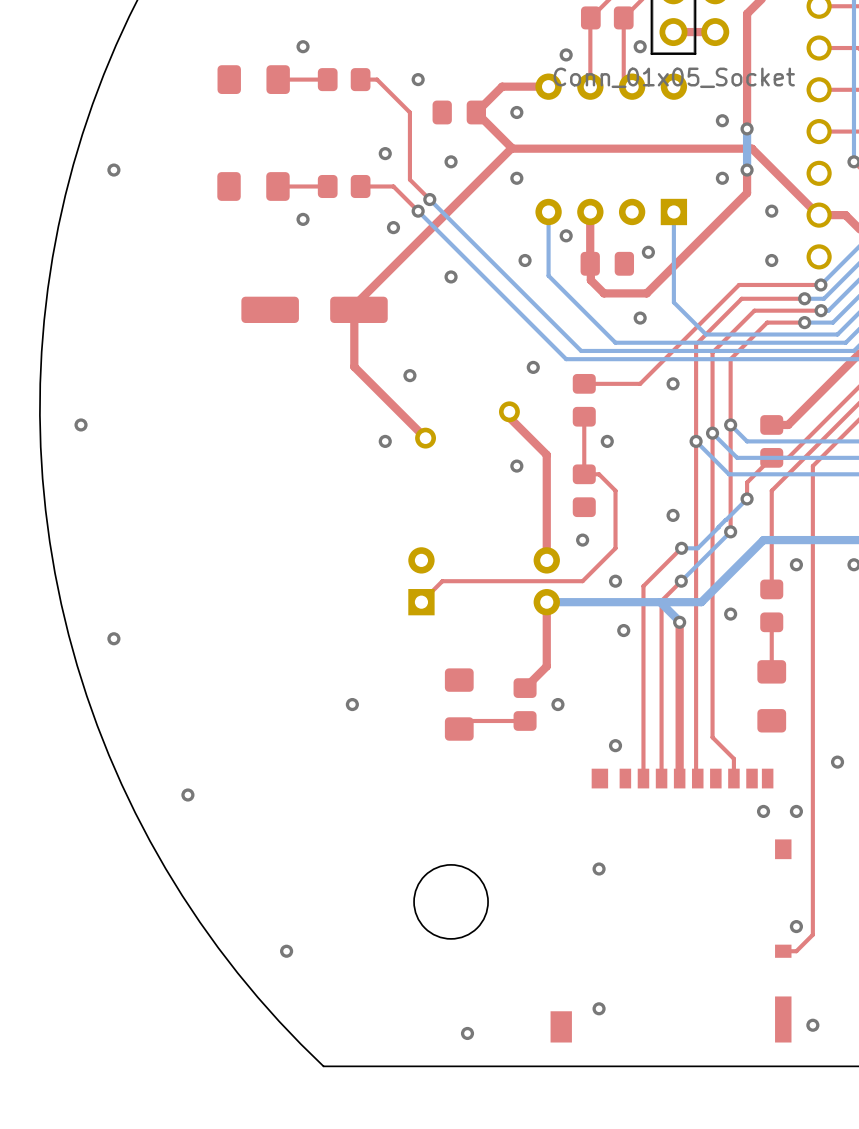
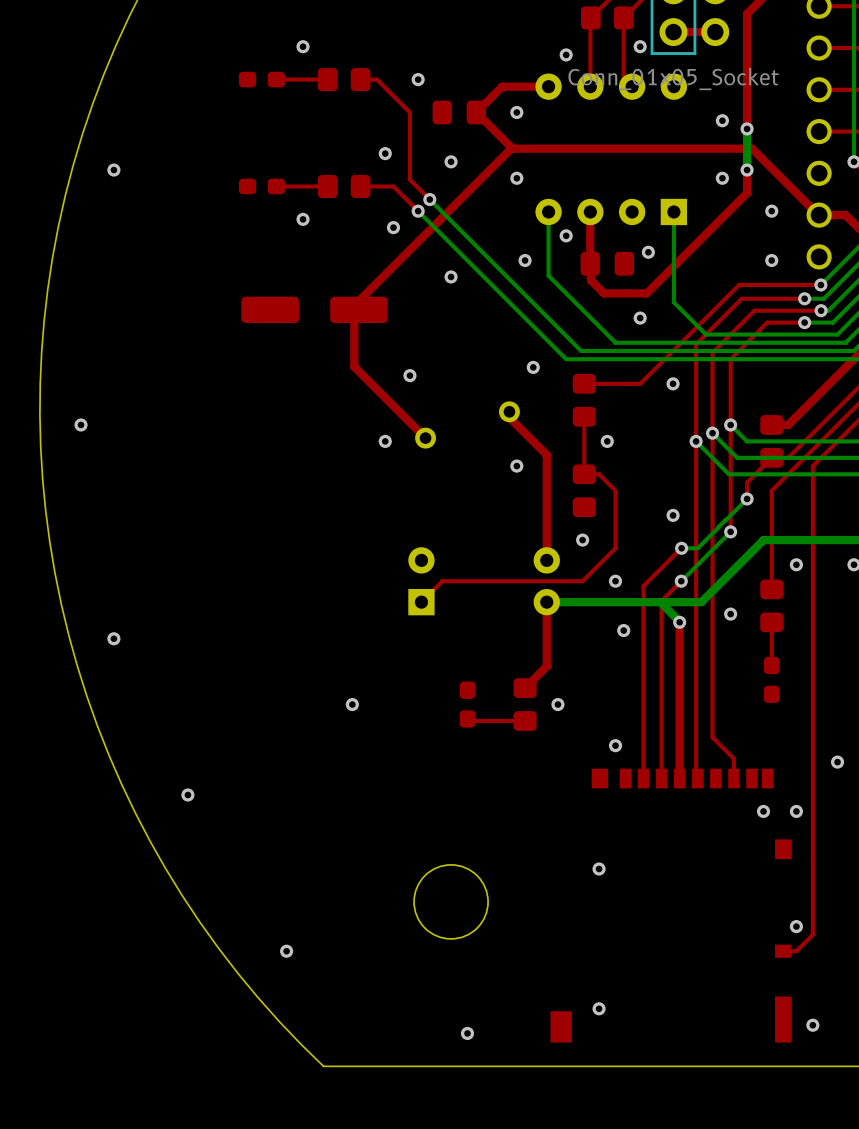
part footprint: [217, 65, 290, 94] -> [238, 71, 285, 88]
part footprint: [217, 172, 290, 201] -> [238, 178, 285, 195]
part footprint: [757, 660, 787, 733] -> [763, 656, 780, 703]
part footprint: [444, 668, 474, 741] -> [459, 681, 476, 728]

